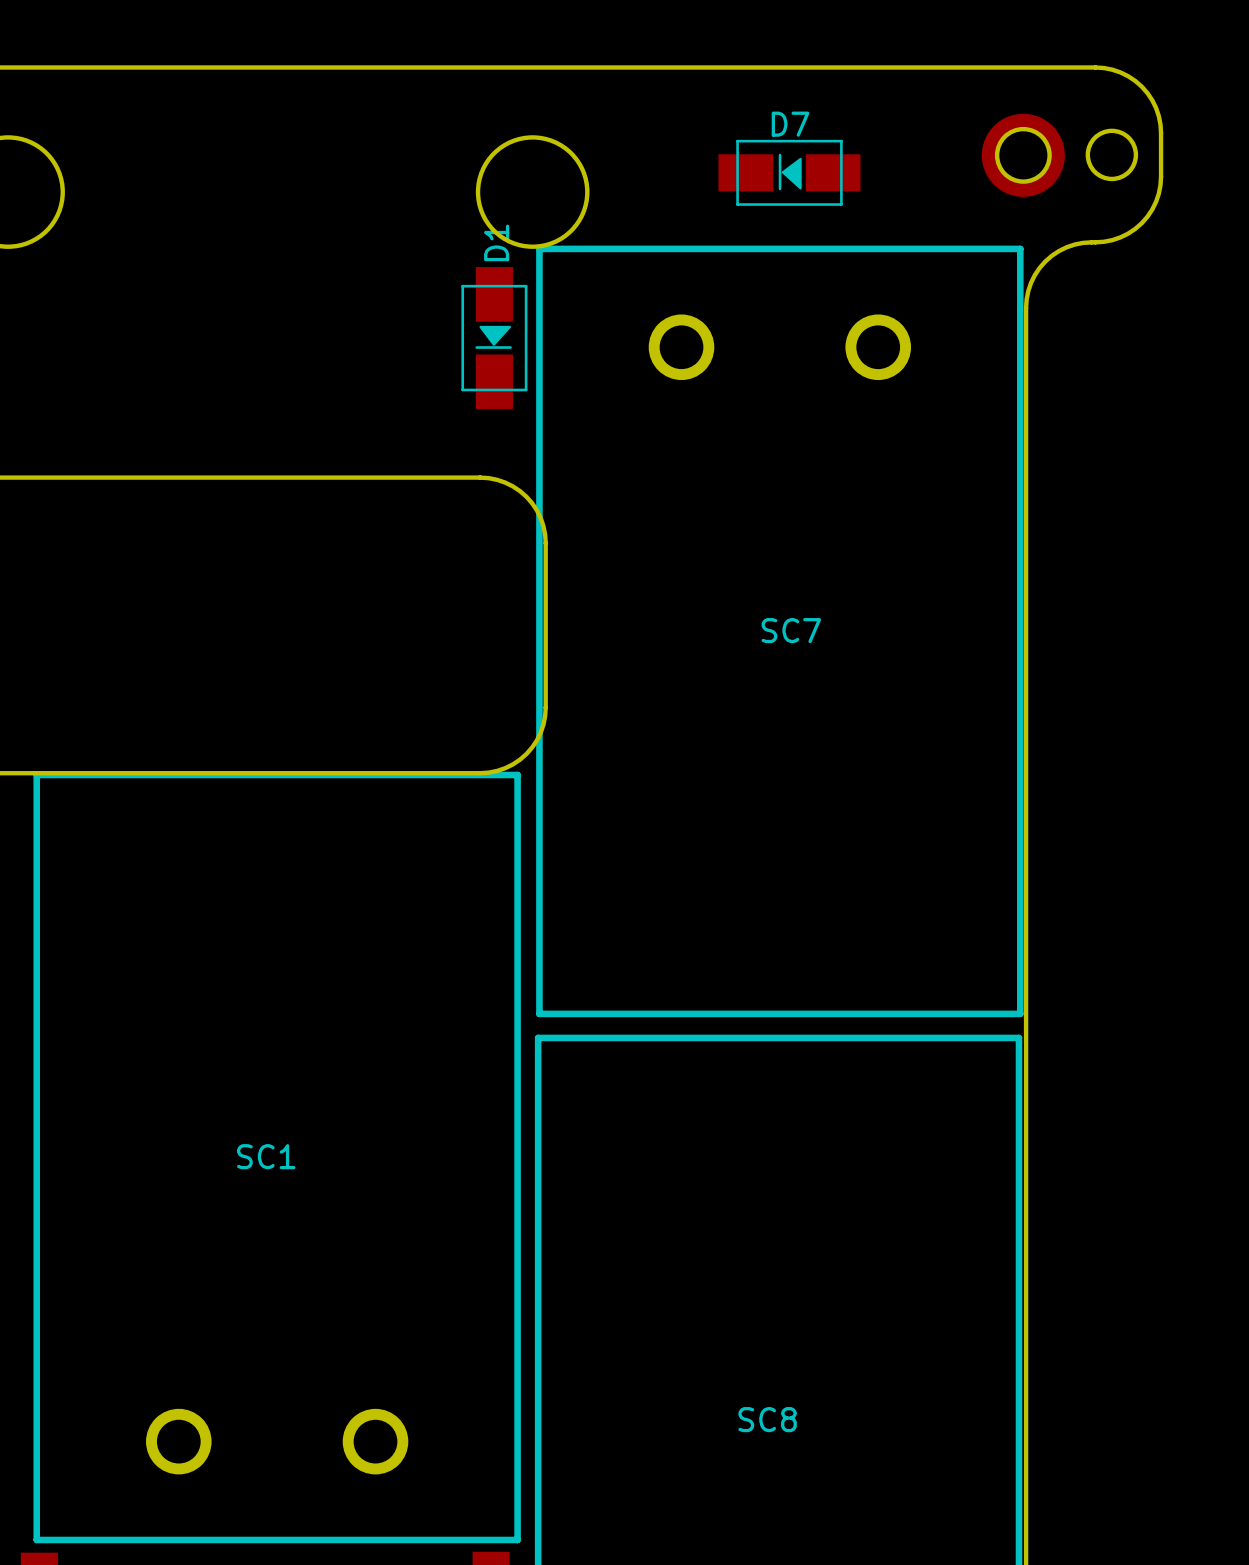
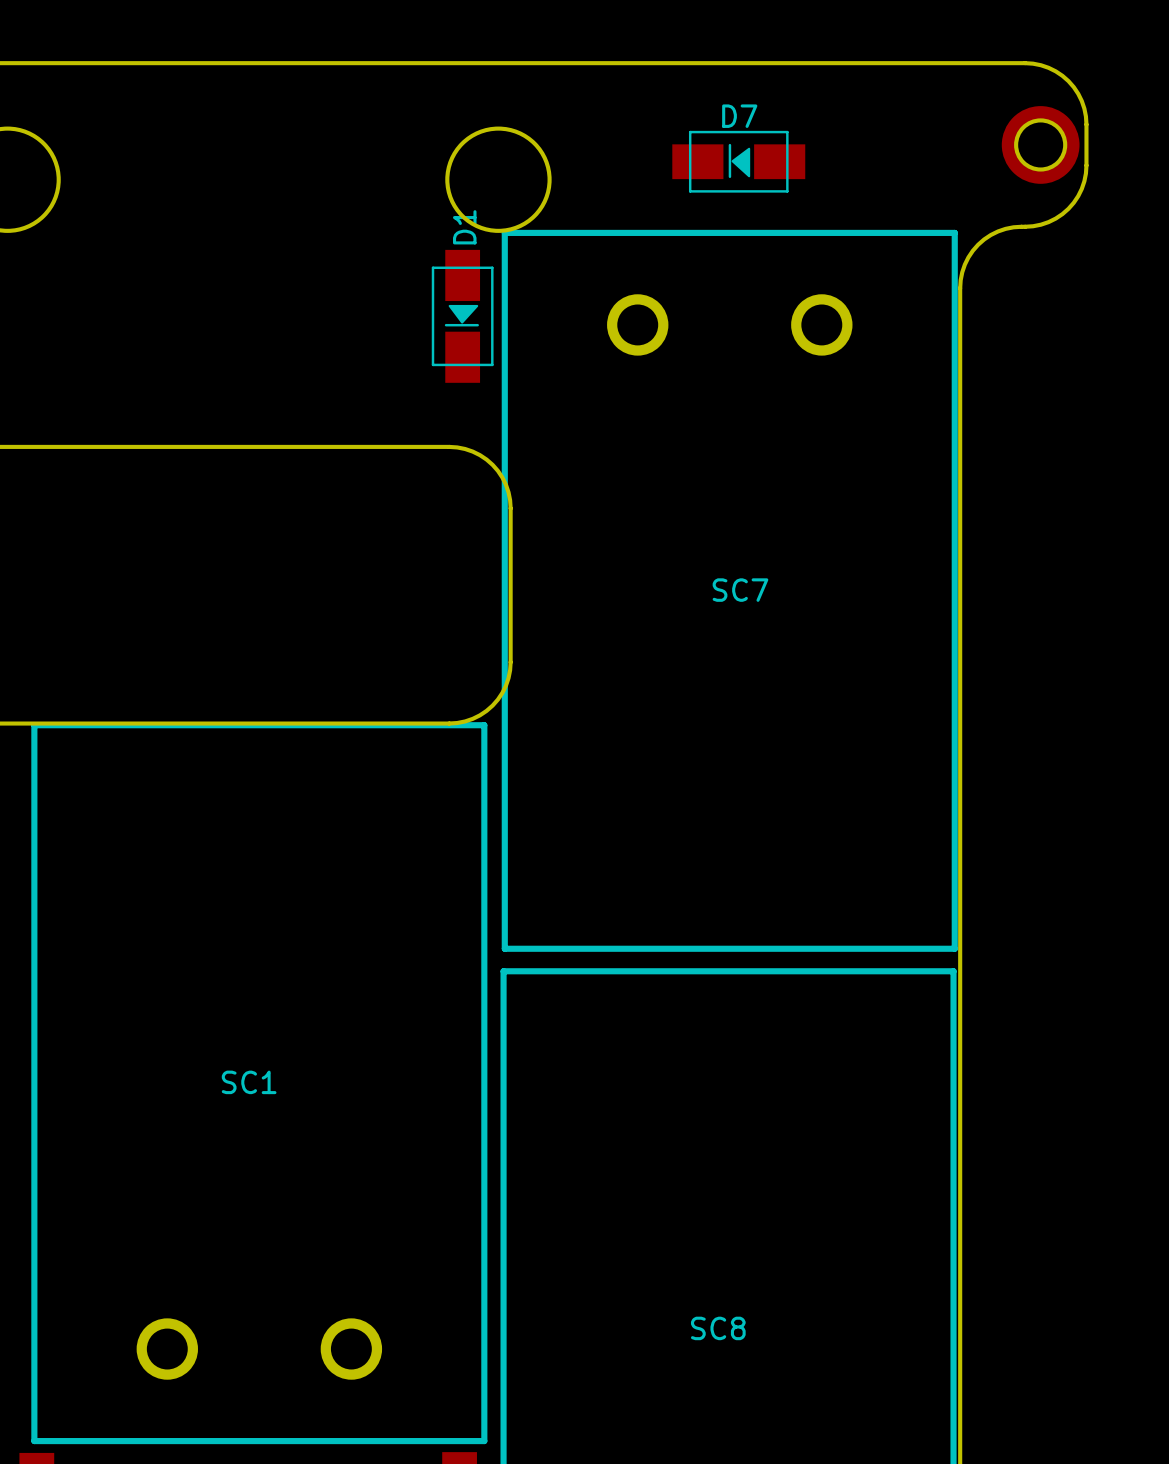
round board edge: [1085, 128, 1139, 182] -> none
part position: (1023, 155) -> (1040, 144)

